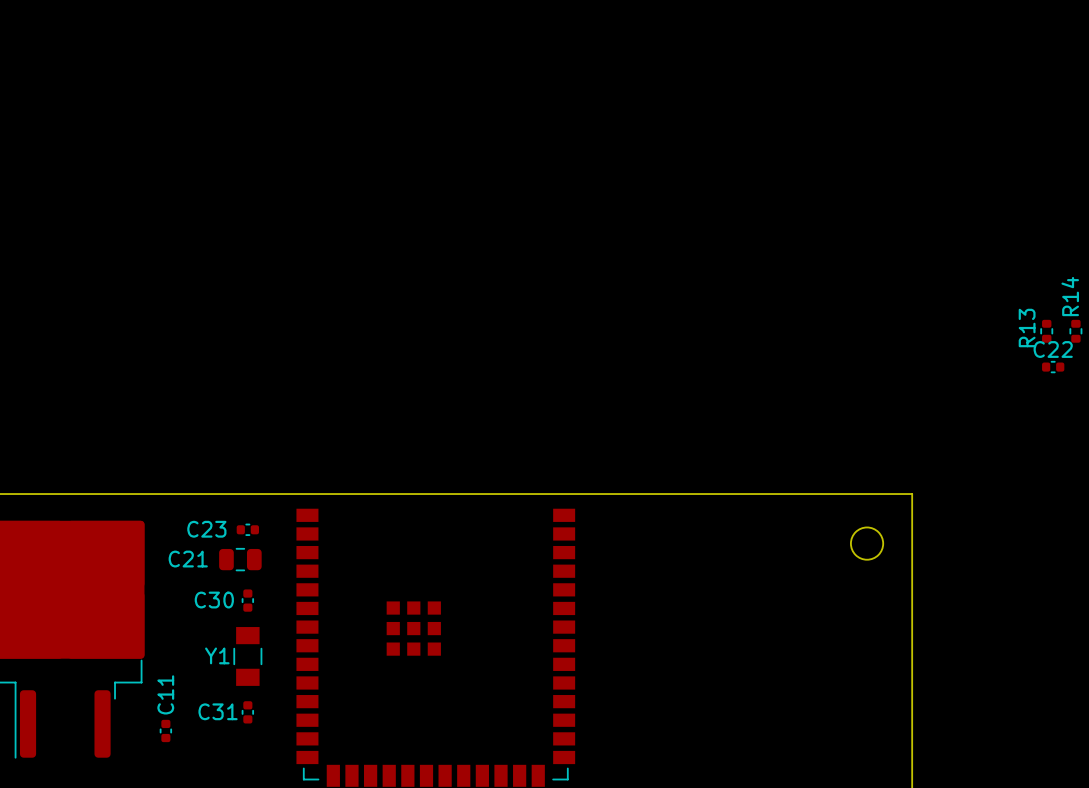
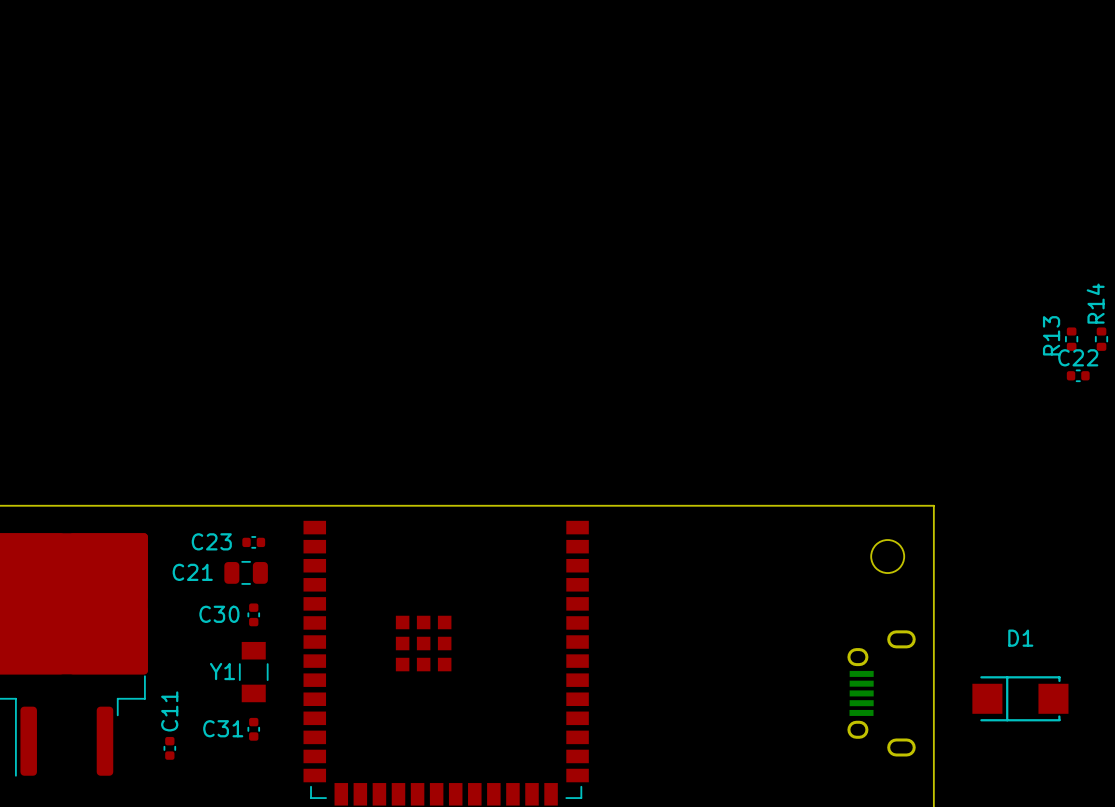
part: none -> (881, 693)
D1: none -> (1020, 698)

